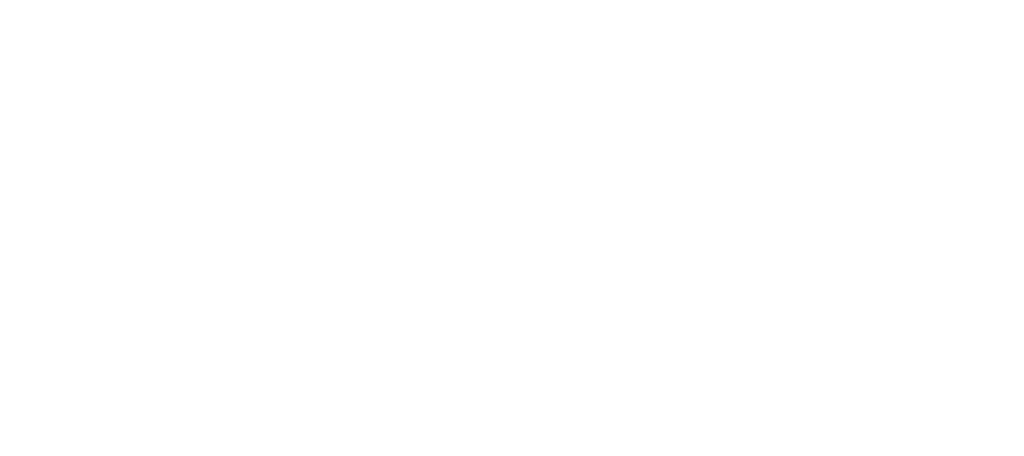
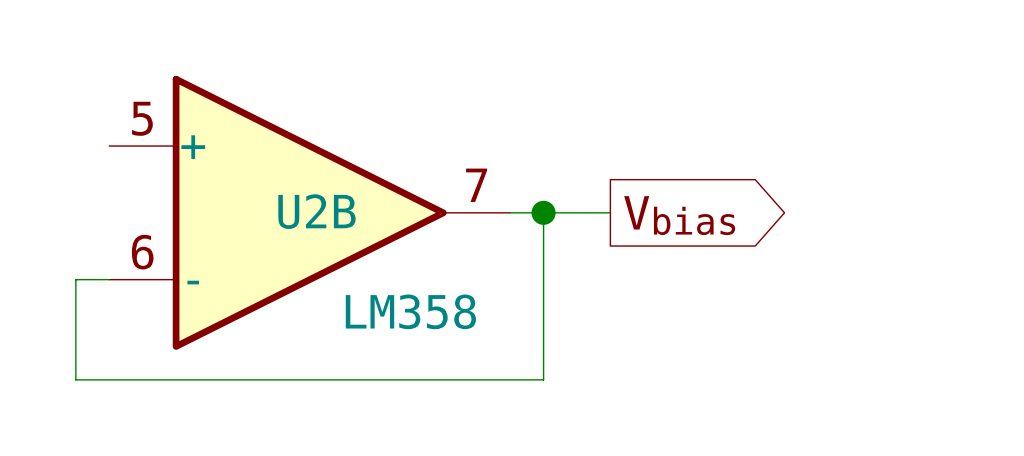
U2B: none -> LM358 (309, 212)
wire: none -> (510, 212) (610, 212)
wire: none -> (543, 212) (543, 379) (75, 379) (75, 279) (109, 279)
junction: none -> (543, 212)
global label: none -> Vbias (679, 215)

